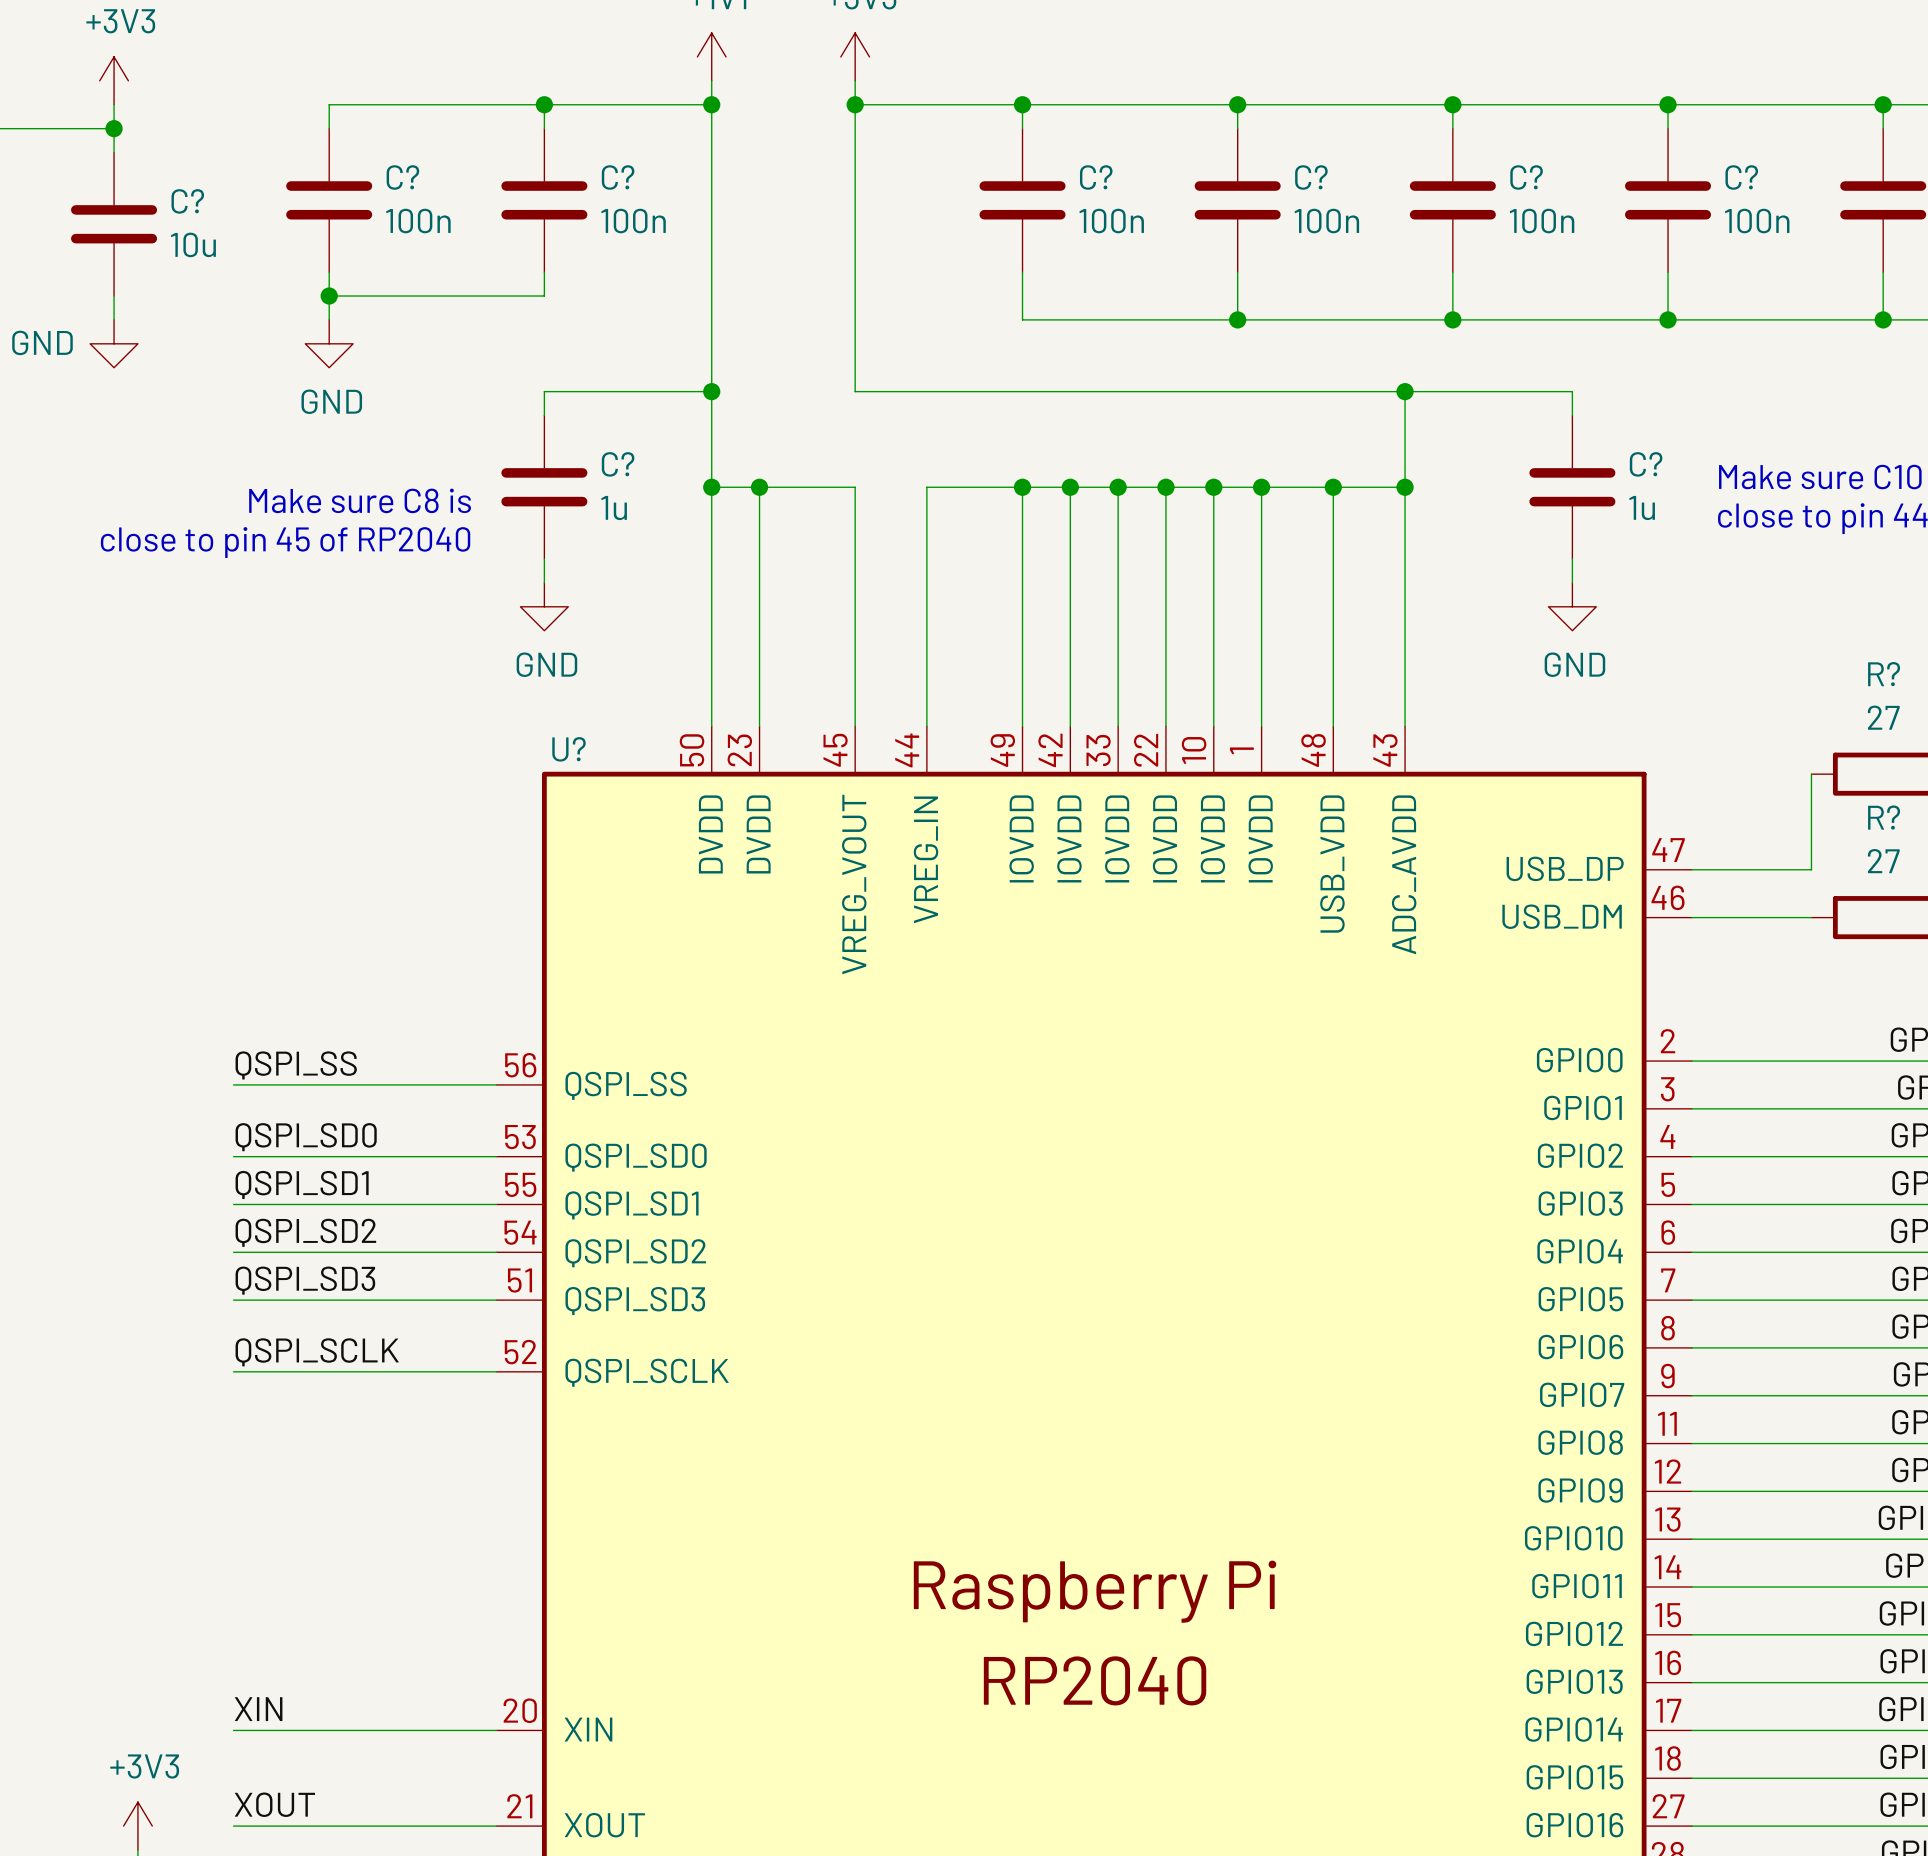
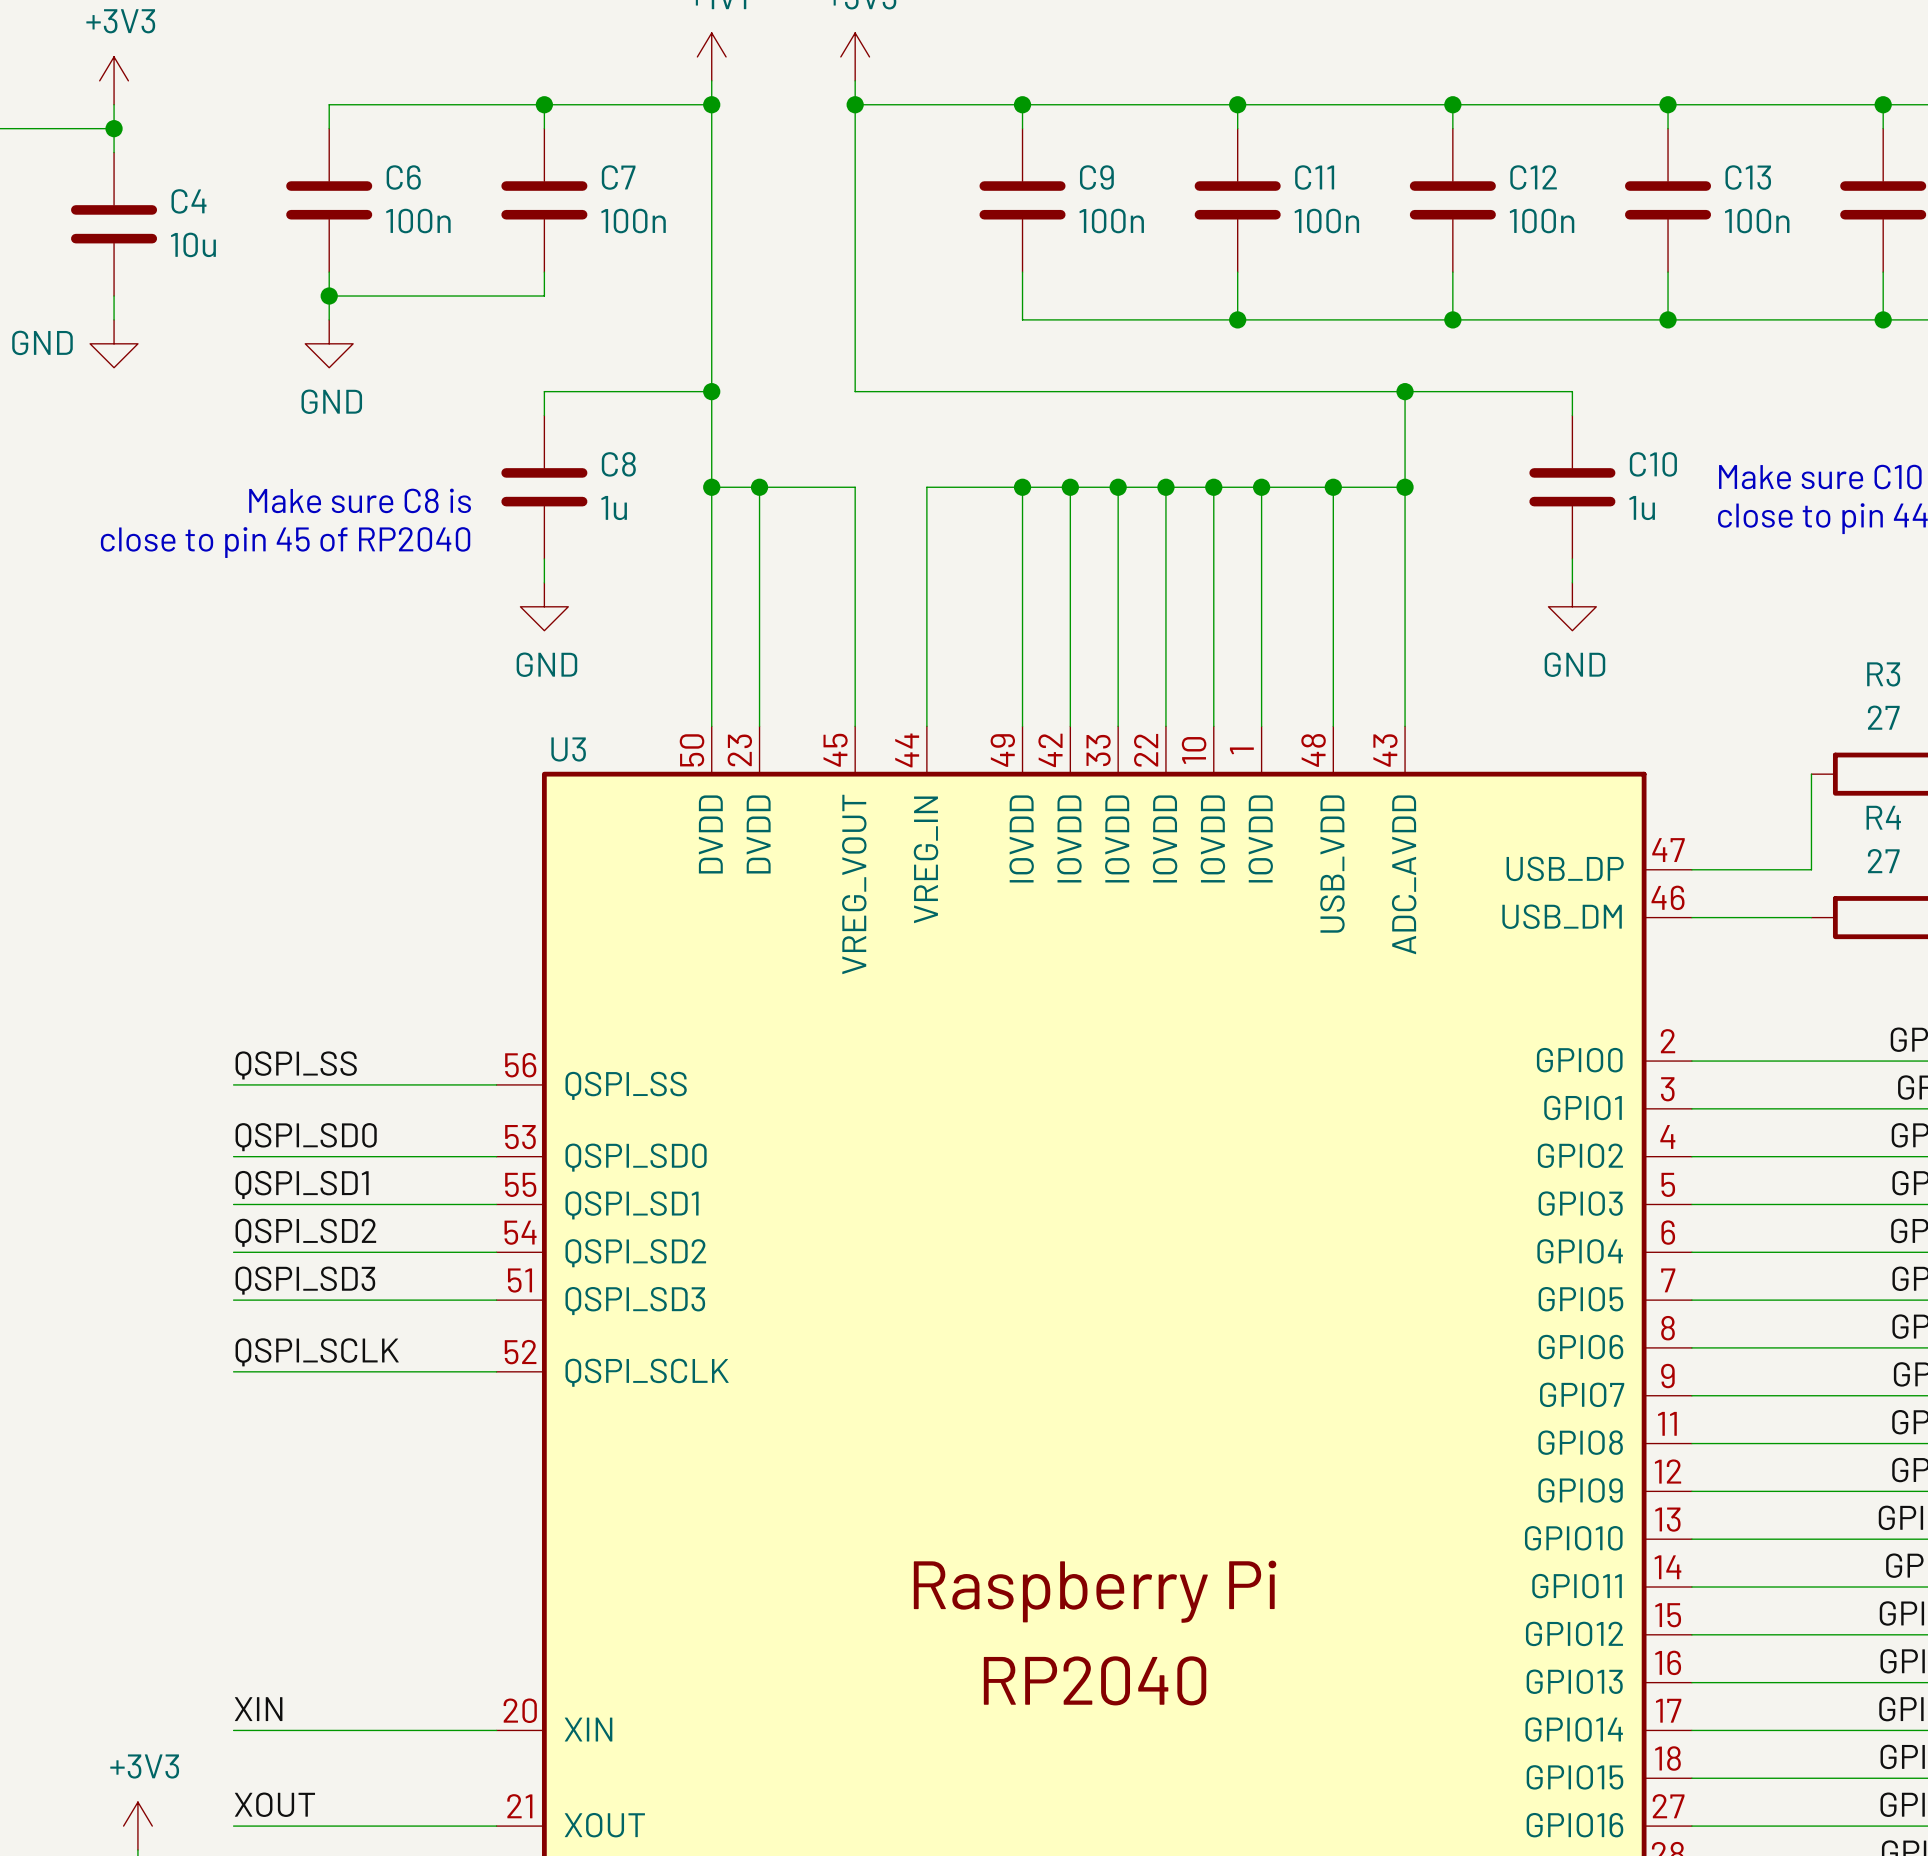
C? name: C? (402, 177) -> C6 (403, 177)
C? name: C? (618, 177) -> C7 (618, 177)
C? name: C? (1096, 177) -> C9 (1096, 177)
C? name: C? (1311, 177) -> C11 (1314, 177)
C? name: C? (1526, 177) -> C12 (1533, 177)
C? name: C? (1741, 177) -> C13 (1748, 177)
C? name: C? (187, 201) -> C4 (188, 201)
C? name: C? (618, 464) -> C8 (618, 464)
C? name: C? (1646, 464) -> C10 (1653, 464)
R? name: R? (1884, 674) -> R3 (1883, 674)
U? name: U? (569, 749) -> U3 (568, 749)
R? name: R? (1884, 817) -> R4 (1883, 817)

